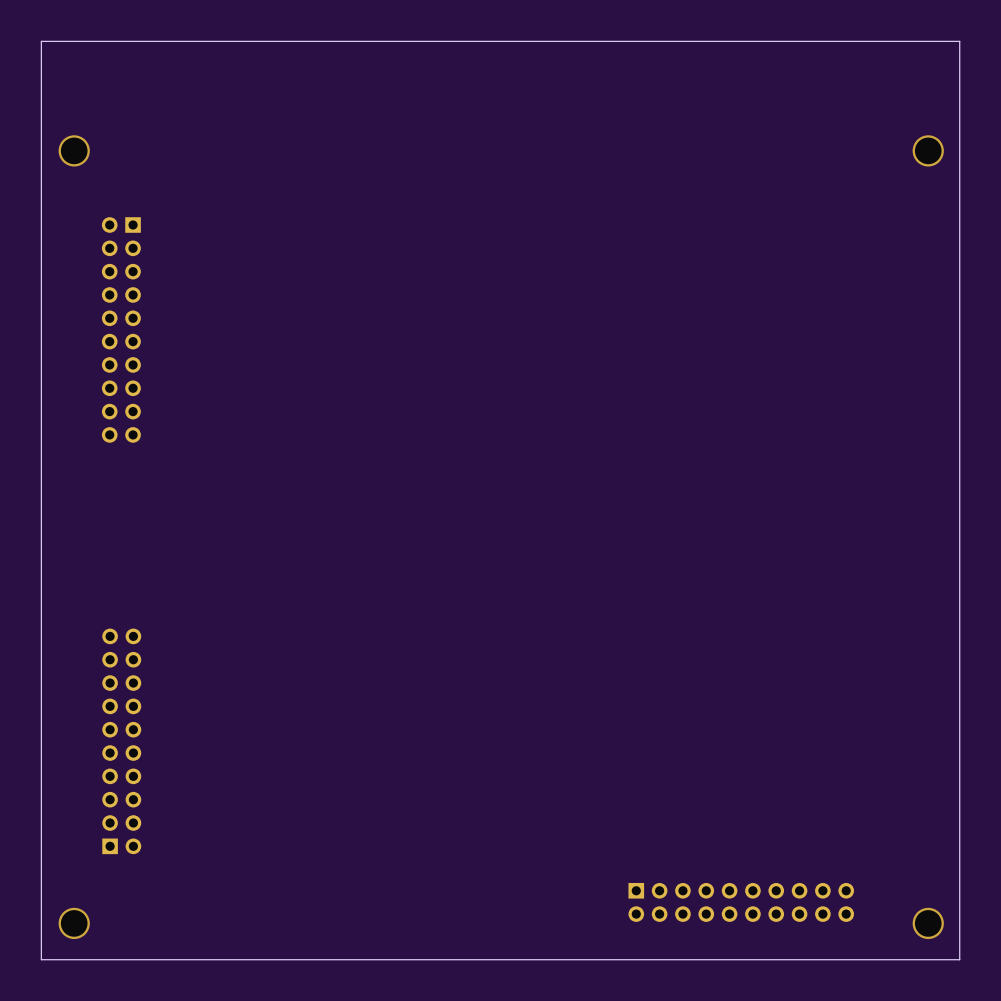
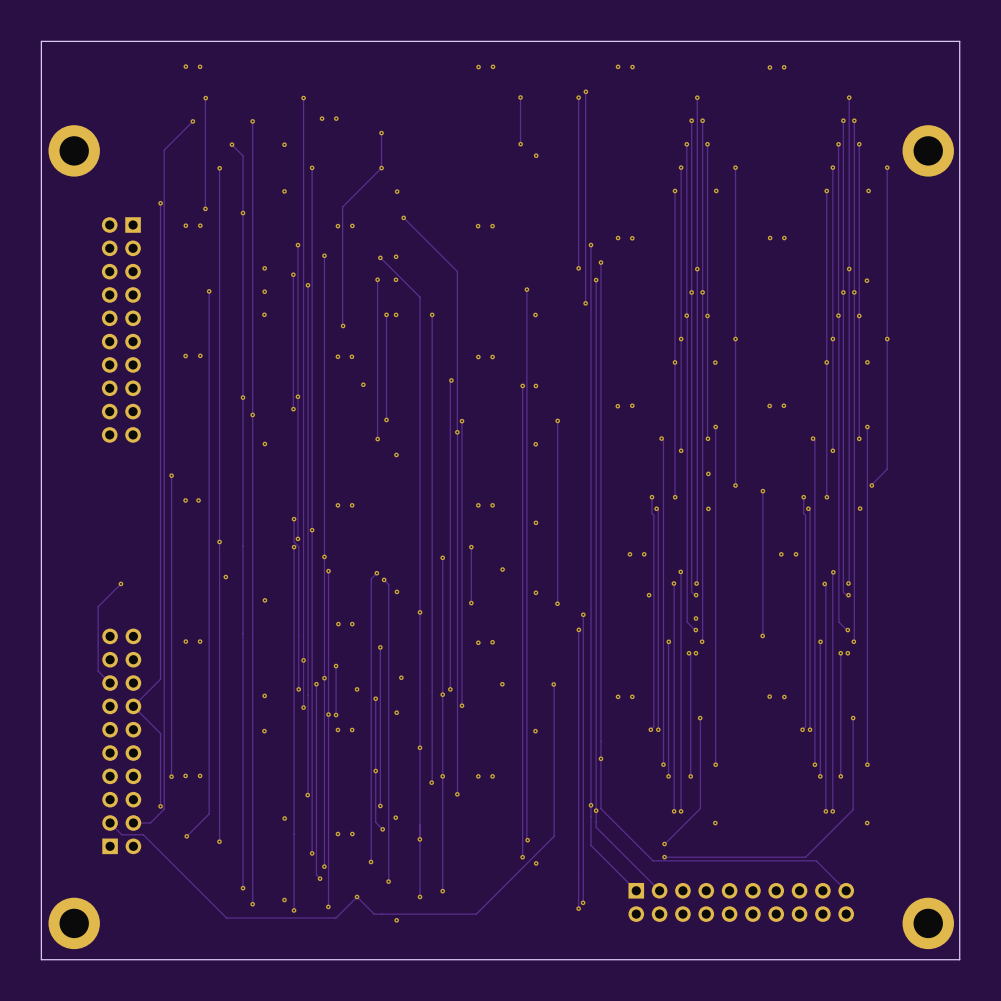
via: none -> (185, 66)
via: none -> (200, 66)
via: none -> (493, 66)
via: none -> (618, 66)
via: none -> (478, 67)
via: none -> (632, 67)
via: none -> (769, 67)
via: none -> (784, 67)
track: none -> (585, 91) (585, 303)
via: none -> (585, 91)
track: none -> (520, 97) (520, 144)
via: none -> (520, 97)
track: none -> (578, 97) (578, 268)
via: none -> (578, 97)
track: none -> (697, 97) (696, 583)
via: none -> (697, 97)
track: none -> (849, 97) (848, 583)
via: none -> (849, 97)
track: none -> (205, 98) (205, 208)
via: none -> (205, 98)
track: none -> (303, 98) (303, 707)
via: none -> (303, 98)
via: none -> (322, 118)
via: none -> (336, 118)
track: none -> (691, 120) (691, 592) (694, 595)
via: none -> (691, 120)
track: none -> (702, 120) (702, 641)
via: none -> (702, 120)
track: none -> (843, 120) (843, 592) (846, 595)
via: none -> (843, 120)
track: none -> (854, 120) (853, 641)
via: none -> (854, 120)
track: none -> (192, 121) (164, 150) (164, 809) (150, 823) (133, 823)
via: none -> (192, 121)
track: none -> (252, 121) (252, 904)
via: none -> (252, 121)
track: none -> (381, 133) (381, 168) (342, 207) (343, 325)
via: none -> (381, 133)
track: none -> (232, 144) (243, 155) (243, 888)
via: none -> (232, 144)
via: none -> (284, 144)
via: none -> (520, 144)
track: none -> (686, 144) (686, 315)
via: none -> (686, 144)
track: none -> (707, 144) (707, 437)
via: none -> (707, 144)
track: none -> (838, 144) (838, 315)
via: none -> (838, 144)
track: none -> (859, 144) (859, 438)
via: none -> (859, 144)
via: (74, 150) -> none
part: none -> (74, 150)
via: (928, 150) -> none
part: none -> (928, 150)
via: none -> (536, 155)
track: none -> (312, 167) (312, 853)
via: none -> (312, 167)
track: none -> (681, 167) (681, 450)
via: none -> (681, 167)
track: none -> (735, 167) (735, 485)
via: none -> (735, 167)
track: none -> (832, 167) (832, 450)
via: none -> (832, 167)
track: none -> (887, 167) (887, 469) (870, 485)
via: none -> (887, 167)
track: none -> (219, 168) (219, 841)
via: none -> (219, 168)
via: none -> (381, 168)
via: none -> (716, 190)
via: none -> (868, 190)
via: none -> (284, 191)
via: none -> (397, 191)
track: none -> (675, 191) (675, 497)
via: none -> (675, 191)
track: none -> (826, 191) (826, 497)
via: none -> (826, 191)
track: none -> (160, 203) (160, 679) (133, 706) (160, 733) (160, 806)
via: none -> (160, 203)
via: none -> (205, 208)
via: none -> (243, 213)
track: none -> (403, 217) (457, 271) (457, 794)
via: none -> (403, 217)
via: none -> (185, 225)
via: none -> (200, 225)
via: none -> (352, 225)
via: none -> (337, 226)
via: none -> (478, 226)
via: none -> (492, 226)
via: none -> (618, 238)
via: none -> (632, 238)
via: none -> (770, 238)
via: none -> (784, 238)
track: none -> (297, 245) (297, 538)
via: none -> (297, 245)
track: none -> (591, 245) (591, 845) (636, 890)
via: none -> (591, 245)
track: none -> (324, 255) (324, 866)
via: none -> (324, 255)
via: none -> (396, 256)
track: none -> (380, 257) (420, 297) (420, 612)
via: none -> (380, 257)
track: none -> (600, 262) (600, 808) (652, 860) (816, 860) (846, 890)
via: none -> (600, 262)
via: none -> (264, 268)
via: none -> (578, 268)
via: none -> (697, 269)
via: none -> (849, 269)
track: none -> (293, 274) (293, 409)
via: none -> (293, 274)
track: none -> (377, 279) (377, 438)
via: none -> (377, 279)
via: none -> (395, 279)
track: none -> (596, 280) (596, 827) (659, 890)
via: none -> (596, 280)
via: none -> (866, 280)
via: none -> (307, 285)
track: none -> (308, 285) (307, 795)
track: none -> (526, 289) (527, 840)
via: none -> (526, 289)
track: none -> (209, 291) (209, 813) (186, 836)
via: none -> (209, 291)
via: none -> (264, 291)
via: none -> (691, 292)
via: none -> (702, 292)
via: none -> (843, 292)
via: none -> (854, 292)
via: none -> (585, 303)
via: none -> (264, 314)
track: none -> (386, 314) (386, 419)
via: none -> (386, 314)
via: none -> (396, 314)
track: none -> (432, 314) (431, 782)
via: none -> (432, 314)
via: none -> (535, 314)
track: none -> (686, 315) (687, 622) (695, 630)
via: none -> (686, 315)
via: none -> (707, 315)
track: none -> (838, 315) (838, 622) (846, 630)
via: none -> (838, 315)
via: none -> (859, 315)
via: none -> (343, 325)
via: none -> (681, 339)
via: none -> (735, 339)
via: none -> (832, 339)
via: none -> (887, 339)
via: none -> (200, 355)
via: none -> (185, 356)
via: none -> (337, 356)
via: none -> (351, 356)
via: none -> (478, 357)
via: none -> (492, 357)
via: none -> (675, 362)
via: none -> (715, 362)
via: none -> (826, 362)
via: none -> (867, 362)
track: none -> (451, 380) (450, 689)
via: none -> (451, 380)
via: none -> (363, 384)
track: none -> (522, 385) (522, 857)
via: none -> (522, 385)
via: none -> (535, 385)
via: none -> (297, 396)
via: none -> (243, 397)
via: none -> (632, 405)
via: none -> (769, 405)
via: none -> (783, 405)
via: none -> (617, 406)
via: none -> (293, 409)
via: none -> (252, 414)
via: none -> (386, 419)
track: none -> (557, 420) (557, 603)
via: none -> (557, 420)
track: none -> (462, 421) (462, 705)
via: none -> (462, 421)
track: none -> (715, 426) (715, 764)
via: none -> (715, 426)
track: none -> (867, 426) (867, 764)
via: none -> (867, 426)
via: none -> (457, 432)
track: none -> (661, 438) (663, 440) (663, 764)
via: none -> (661, 438)
via: none -> (707, 438)
track: none -> (813, 438) (814, 440) (814, 764)
via: none -> (813, 438)
via: none -> (859, 438)
via: none -> (377, 439)
via: none -> (264, 444)
via: none -> (535, 444)
via: none -> (681, 450)
via: none -> (832, 450)
via: none -> (396, 454)
via: none -> (708, 473)
track: none -> (171, 475) (171, 776)
via: none -> (171, 475)
via: none -> (735, 485)
via: none -> (871, 485)
track: none -> (762, 491) (762, 635)
via: none -> (762, 491)
track: none -> (652, 497) (652, 513) (653, 515) (653, 726) (650, 729)
via: none -> (652, 497)
via: none -> (675, 497)
track: none -> (803, 497) (803, 513) (805, 515) (805, 726) (802, 729)
via: none -> (803, 497)
via: none -> (826, 497)
via: none -> (185, 500)
via: none -> (198, 500)
via: none -> (337, 505)
via: none -> (352, 505)
via: none -> (478, 505)
via: none -> (492, 505)
track: none -> (656, 508) (658, 510) (658, 729)
via: none -> (656, 508)
via: none -> (708, 508)
track: none -> (808, 508) (810, 510) (810, 729)
via: none -> (808, 508)
via: none -> (860, 508)
track: none -> (294, 519) (294, 541) (298, 546) (298, 689)
via: none -> (294, 519)
via: none -> (535, 522)
via: none -> (312, 530)
via: none -> (297, 538)
via: none -> (219, 541)
track: none -> (294, 547) (294, 910)
via: none -> (294, 547)
track: none -> (471, 547) (471, 603)
via: none -> (471, 547)
via: none -> (629, 554)
via: none -> (644, 554)
via: none -> (781, 554)
via: none -> (796, 554)
via: none -> (324, 556)
track: none -> (442, 557) (442, 891)
via: none -> (442, 557)
via: none -> (502, 569)
track: none -> (328, 571) (328, 906)
via: none -> (328, 571)
track: none -> (680, 571) (681, 811)
via: none -> (680, 571)
track: none -> (832, 572) (832, 811)
via: none -> (833, 572)
track: none -> (376, 573) (371, 578) (371, 862)
via: none -> (376, 573)
via: none -> (225, 577)
track: none -> (384, 579) (388, 584) (388, 881)
via: none -> (384, 579)
track: none -> (120, 583) (98, 606) (98, 671) (110, 683)
via: none -> (120, 583)
track: none -> (673, 583) (674, 811)
via: none -> (673, 583)
via: none -> (696, 583)
via: none -> (824, 583)
track: none -> (825, 583) (825, 811)
via: none -> (848, 583)
via: none -> (396, 591)
via: none -> (535, 592)
via: none -> (649, 595)
via: none -> (696, 595)
via: none -> (848, 595)
via: none -> (264, 600)
via: none -> (471, 603)
via: none -> (557, 603)
track: none -> (419, 612) (419, 839)
via: none -> (420, 612)
track: none -> (583, 614) (583, 902)
via: none -> (583, 614)
via: none -> (695, 618)
via: none -> (338, 624)
via: none -> (352, 624)
track: none -> (578, 629) (578, 908)
via: none -> (578, 629)
via: none -> (695, 630)
via: none -> (847, 630)
via: none -> (762, 635)
via: none -> (185, 641)
via: none -> (200, 641)
track: none -> (668, 641) (668, 776)
via: none -> (668, 641)
via: none -> (702, 641)
track: none -> (820, 641) (820, 776)
via: none -> (820, 641)
via: none -> (853, 641)
via: none -> (478, 642)
via: none -> (492, 642)
track: none -> (380, 647) (380, 806)
via: none -> (380, 647)
track: none -> (689, 653) (690, 654) (690, 776)
via: none -> (689, 653)
via: none -> (695, 653)
track: none -> (840, 653) (840, 774) (842, 776)
via: none -> (840, 653)
via: none -> (847, 653)
via: none -> (303, 660)
track: none -> (336, 666) (336, 715)
via: none -> (336, 666)
via: none -> (401, 677)
via: none -> (324, 678)
track: none -> (316, 684) (316, 875) (320, 878)
via: none -> (316, 684)
via: none -> (502, 684)
track: none -> (553, 684) (554, 836) (476, 914) (374, 914) (357, 896) (336, 917) (226, 917) (143, 834) (121, 834) (110, 823)
via: none -> (553, 684)
via: none -> (298, 689)
via: none -> (357, 689)
via: none -> (450, 689)
via: none -> (442, 694)
via: none -> (264, 695)
via: none -> (618, 696)
via: none -> (632, 696)
via: none -> (769, 696)
via: none -> (784, 697)
track: none -> (375, 698) (375, 822) (382, 829)
via: none -> (375, 698)
via: none -> (462, 705)
via: none -> (303, 707)
via: none -> (396, 712)
via: none -> (328, 714)
via: none -> (336, 715)
track: none -> (700, 718) (700, 808) (664, 844)
via: none -> (700, 718)
track: none -> (853, 718) (853, 809) (805, 857) (664, 857)
via: none -> (853, 718)
via: none -> (337, 729)
via: none -> (352, 729)
via: none -> (650, 729)
via: none -> (658, 729)
via: none -> (802, 729)
via: none -> (810, 729)
via: none -> (264, 731)
via: none -> (535, 731)
via: none -> (419, 747)
via: none -> (600, 758)
via: none -> (663, 764)
via: none -> (715, 764)
via: none -> (814, 764)
via: none -> (867, 764)
via: none -> (375, 771)
via: none -> (185, 775)
via: none -> (200, 775)
via: none -> (171, 776)
via: none -> (442, 776)
via: none -> (478, 776)
via: none -> (492, 776)
via: none -> (668, 776)
via: none -> (690, 776)
via: none -> (820, 776)
via: none -> (840, 776)
via: none -> (431, 782)
via: none -> (457, 794)
via: none -> (307, 795)
via: none -> (591, 805)
via: none -> (160, 806)
via: none -> (380, 806)
via: none -> (596, 810)
via: none -> (674, 811)
via: none -> (681, 811)
via: none -> (825, 811)
via: none -> (832, 811)
via: none -> (395, 817)
via: none -> (284, 818)
via: none -> (715, 823)
via: none -> (867, 823)
track: none -> (420, 824) (420, 896)
via: none -> (382, 829)
via: none -> (337, 834)
via: none -> (352, 834)
via: none -> (186, 836)
via: none -> (419, 839)
via: none -> (527, 840)
via: none -> (219, 841)
via: none -> (664, 844)
via: none -> (312, 853)
via: none -> (522, 857)
via: none -> (664, 857)
via: none -> (371, 862)
via: none -> (536, 863)
via: none -> (324, 866)
via: none -> (320, 878)
via: none -> (388, 881)
via: none -> (243, 888)
via: none -> (442, 891)
via: none -> (357, 896)
via: none -> (420, 896)
via: none -> (284, 900)
via: none -> (583, 902)
via: none -> (252, 904)
via: none -> (328, 906)
via: none -> (578, 908)
via: none -> (294, 910)
via: none -> (396, 920)
via: (74, 923) -> none
part: none -> (74, 923)
via: (928, 923) -> none
part: none -> (928, 923)

